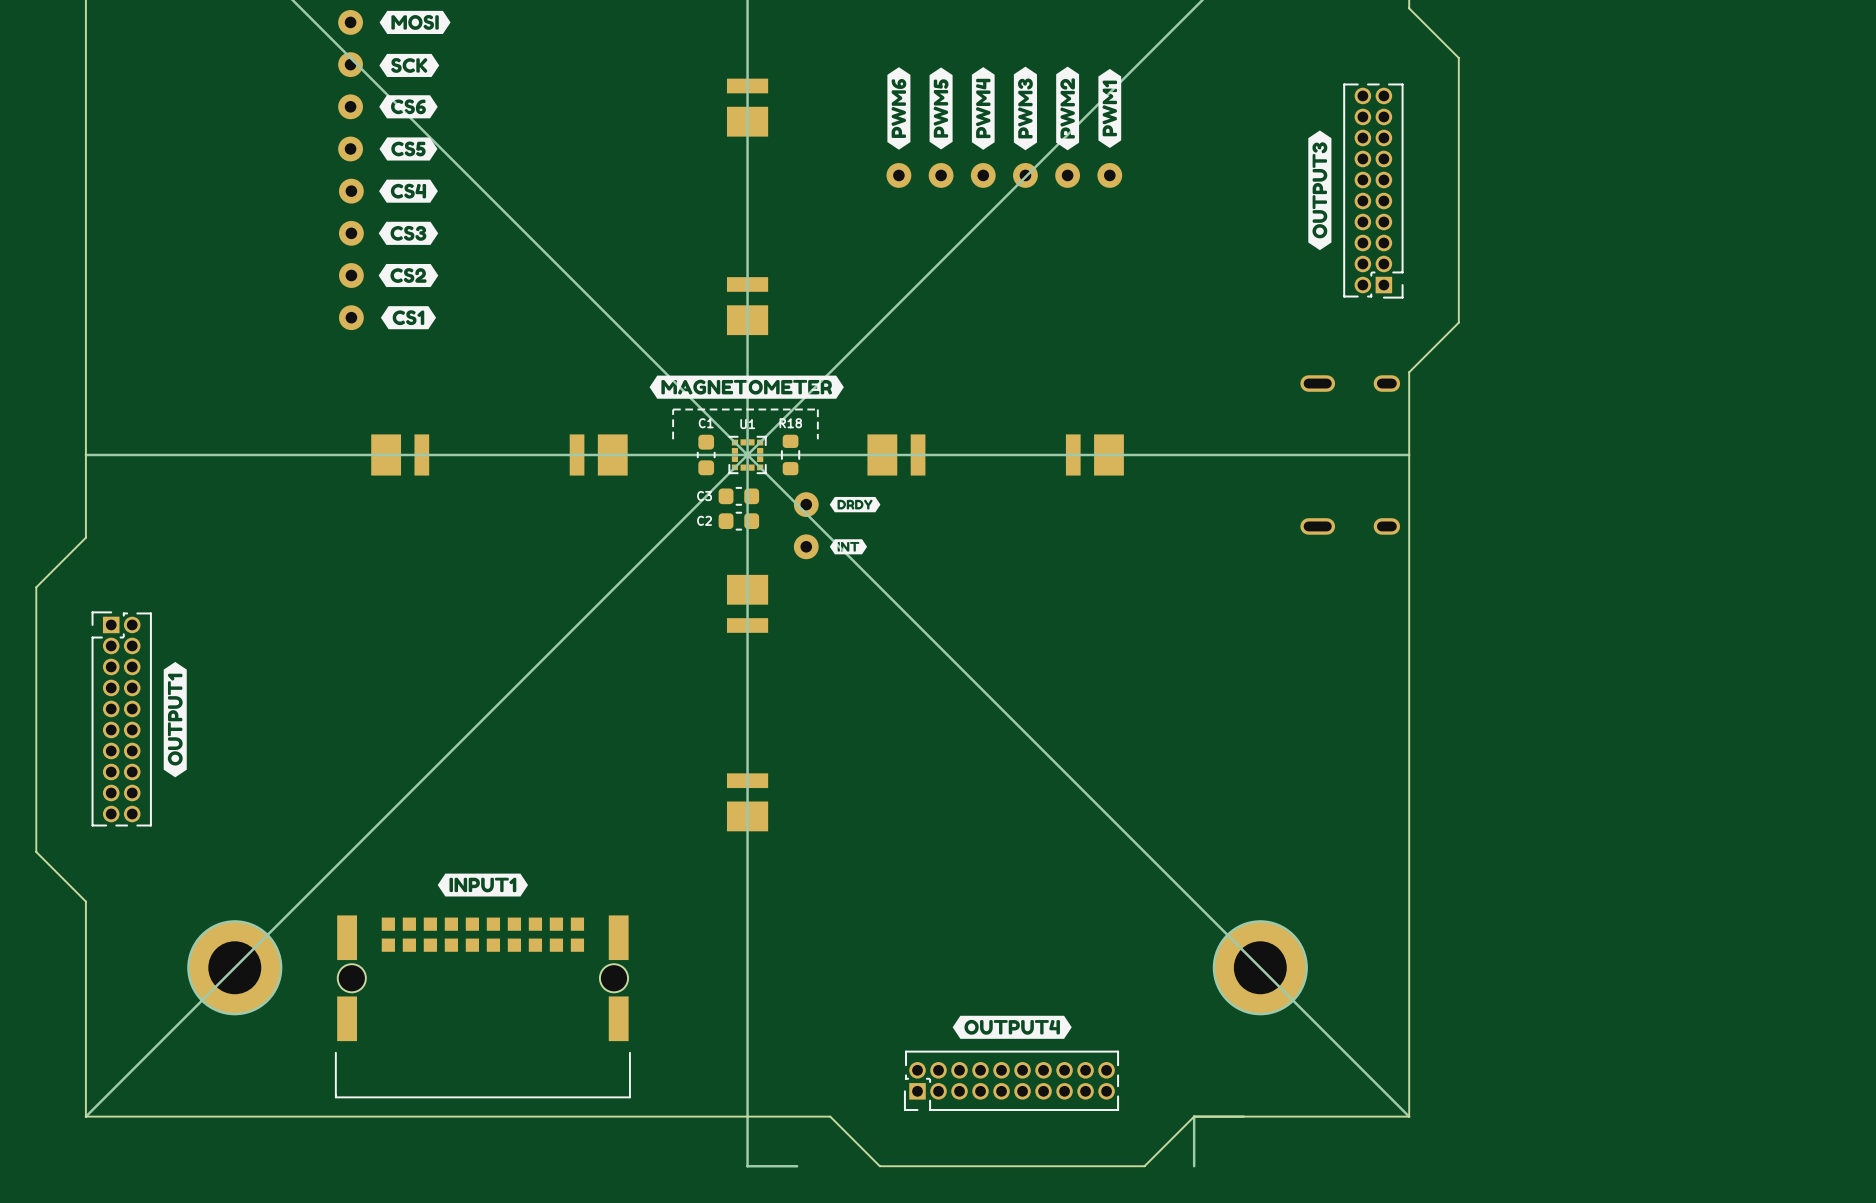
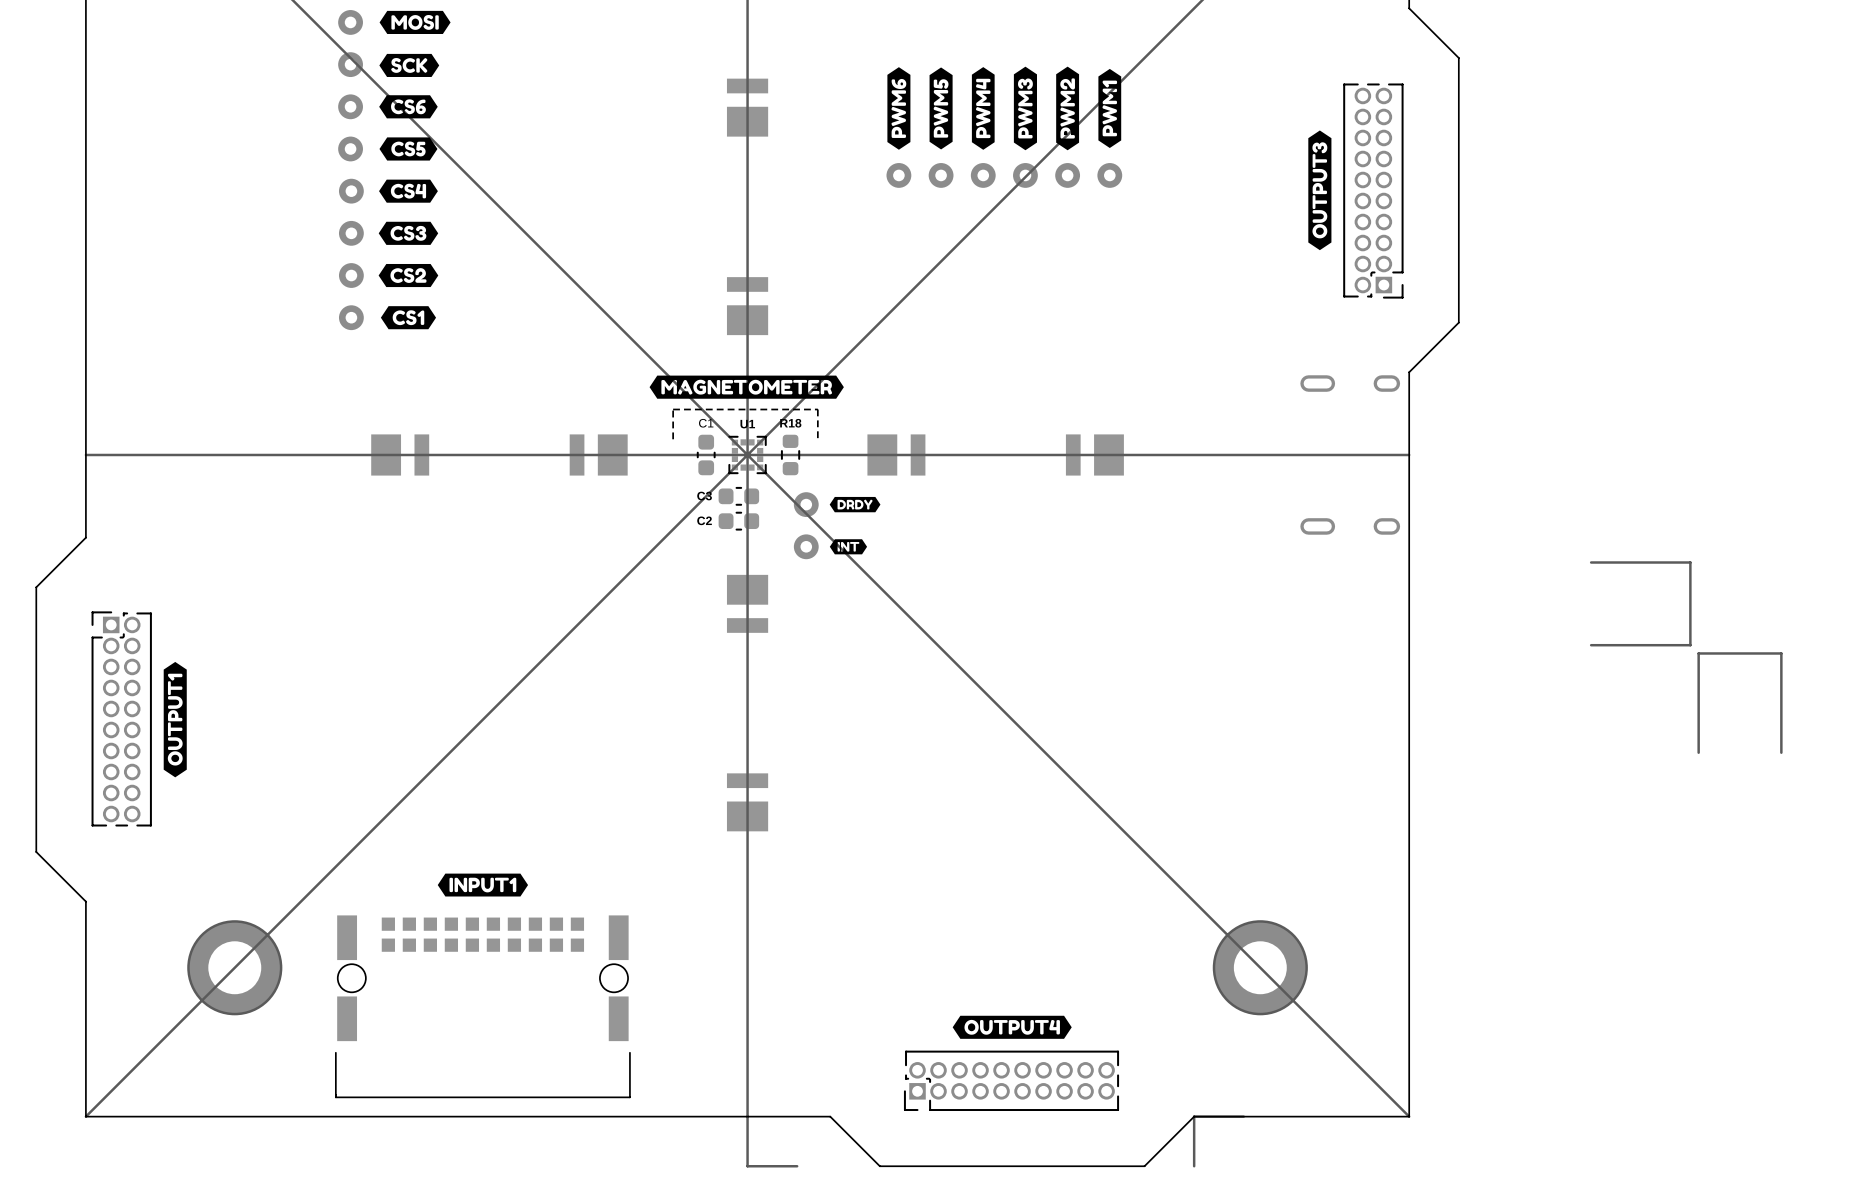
line: none -> (1591, 562) (1690, 562) (1690, 645) (1591, 645)
line: none -> (1698, 752) (1698, 653) (1781, 653) (1781, 752)

